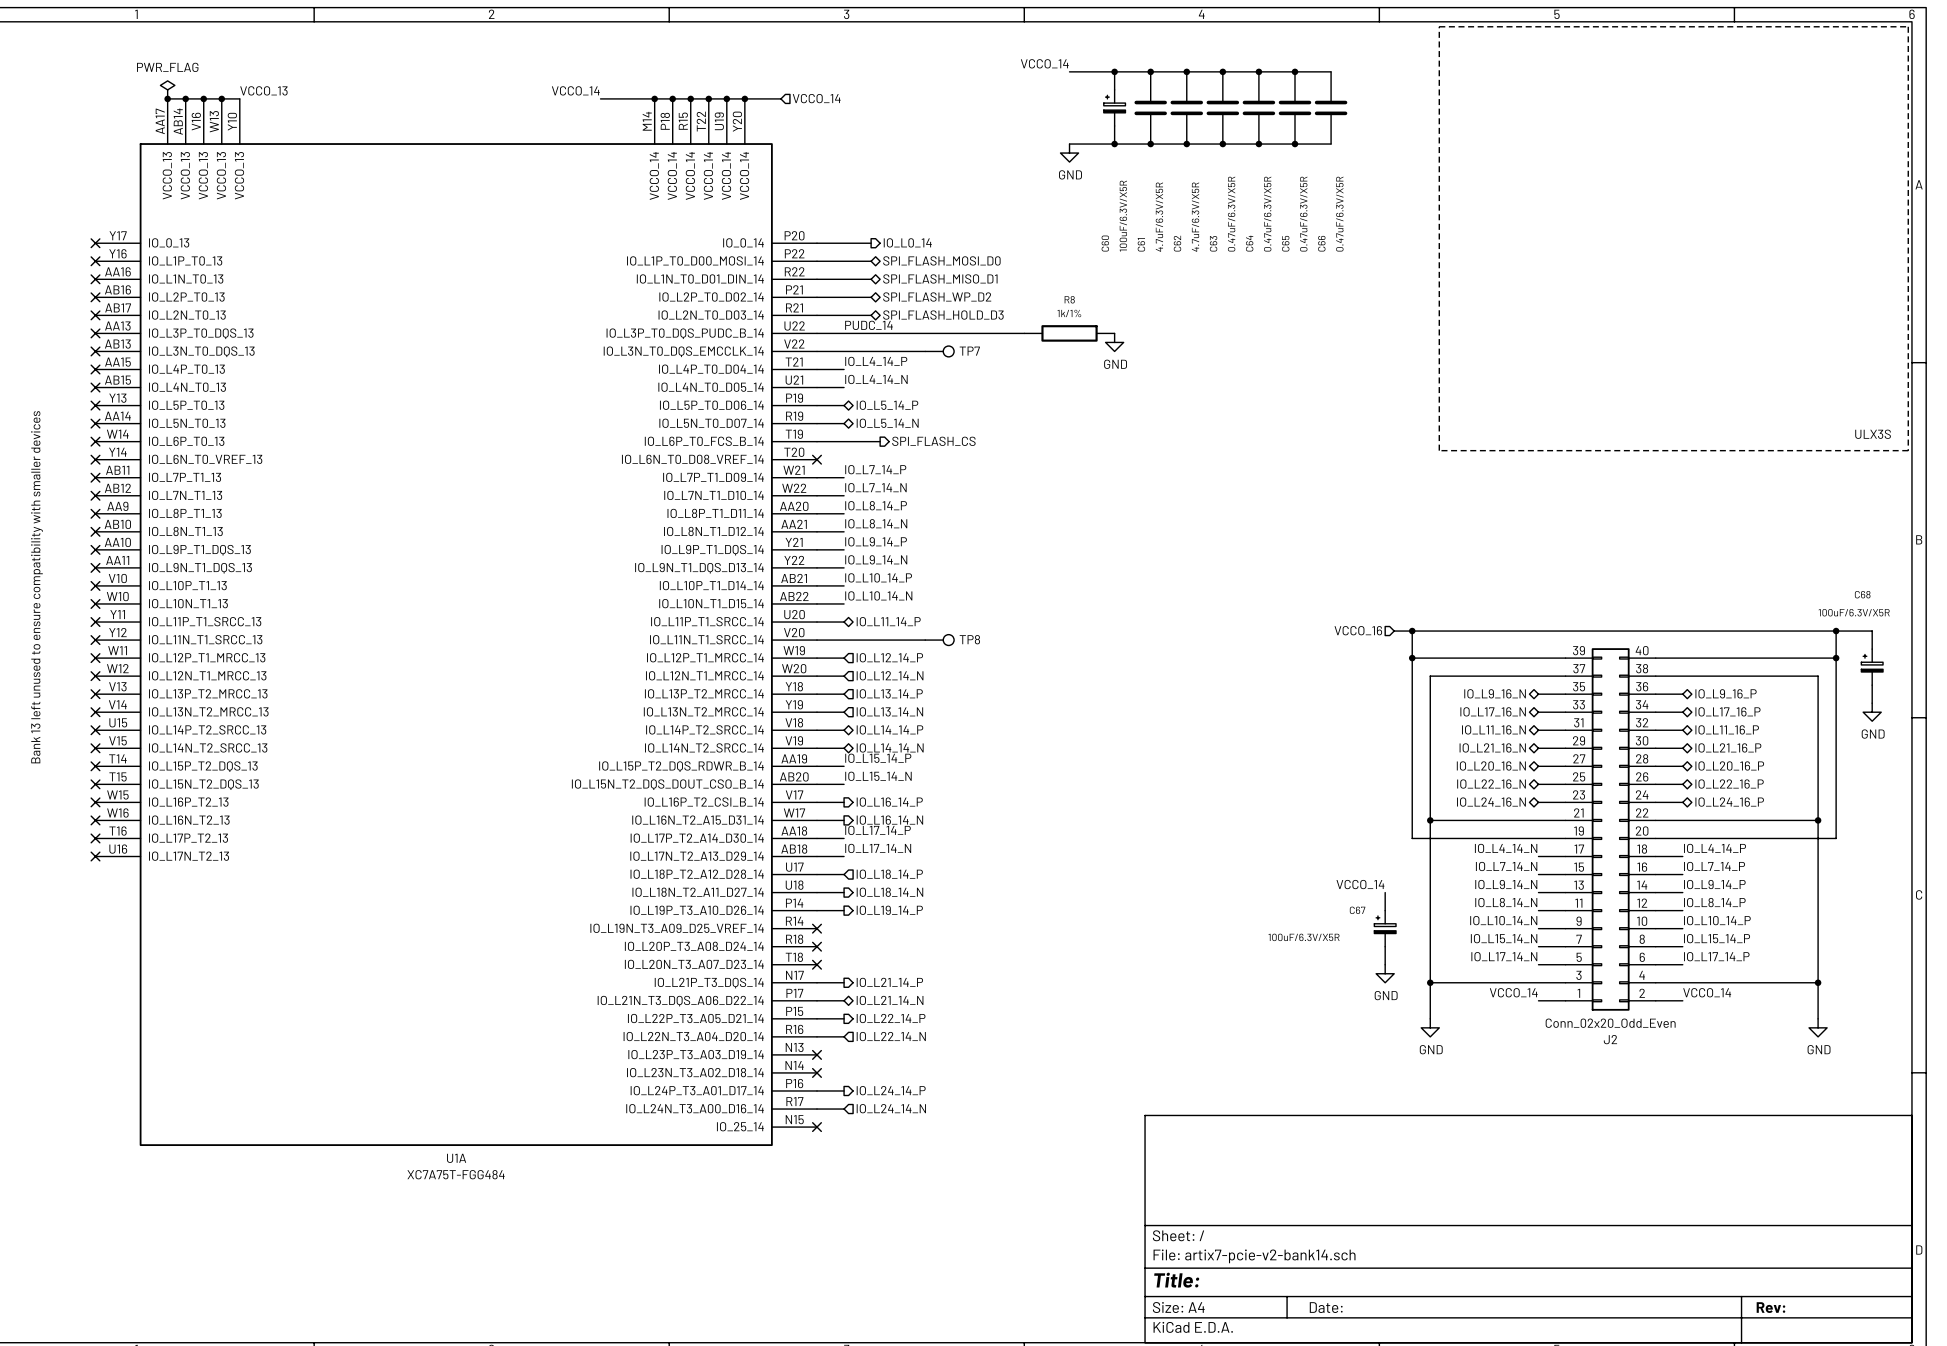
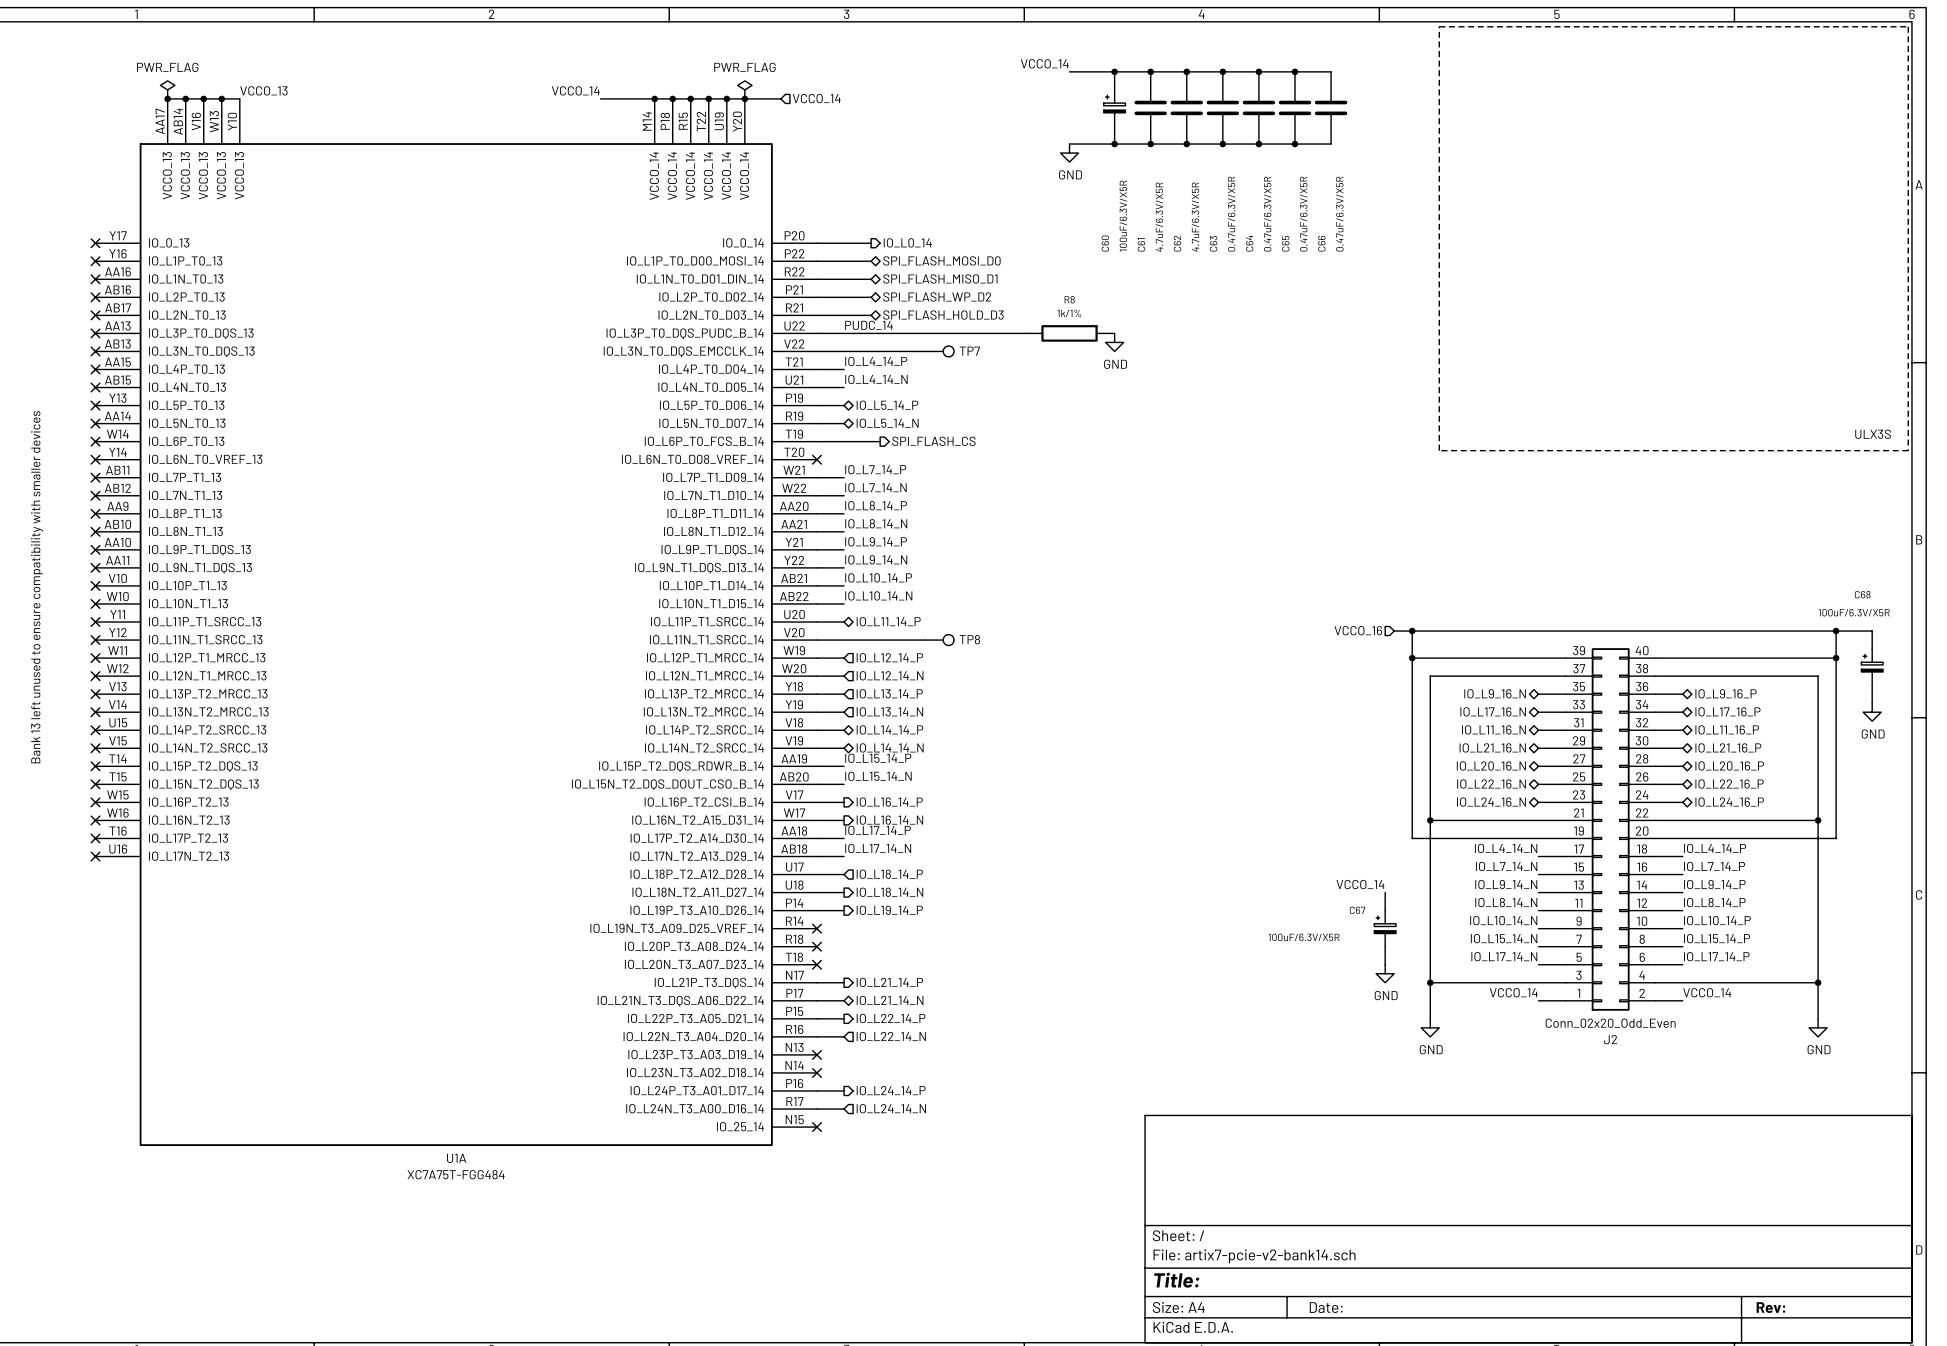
power symbol: none -> PWR_FLAG (744, 89)

